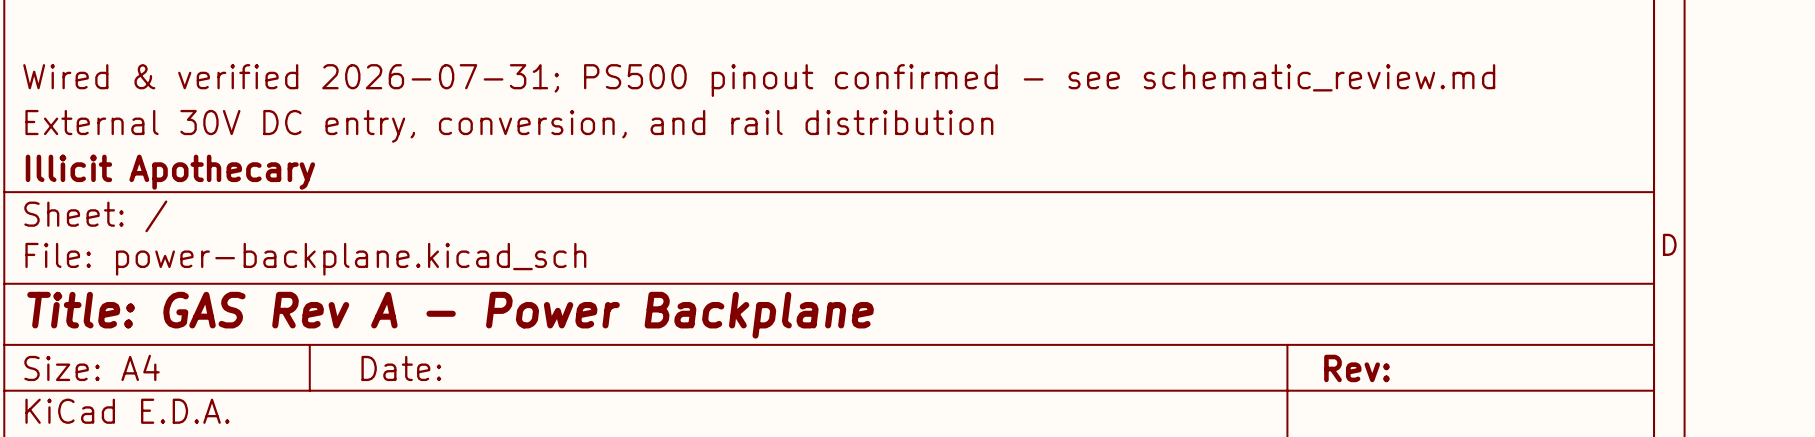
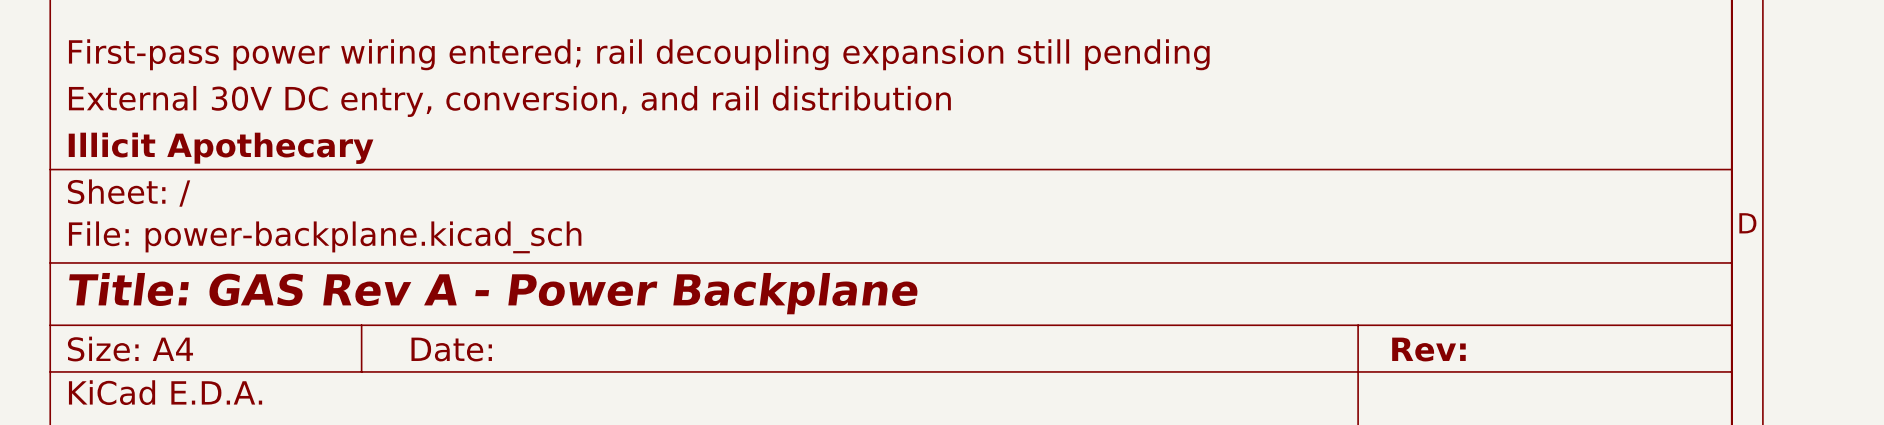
title block: Wired & verified 2026-07-31; PS500 pinout confirmed - see schematic_review.md (759, 80) -> First-pass power wiring entered; rail decoupling expansion still pending (639, 54)

